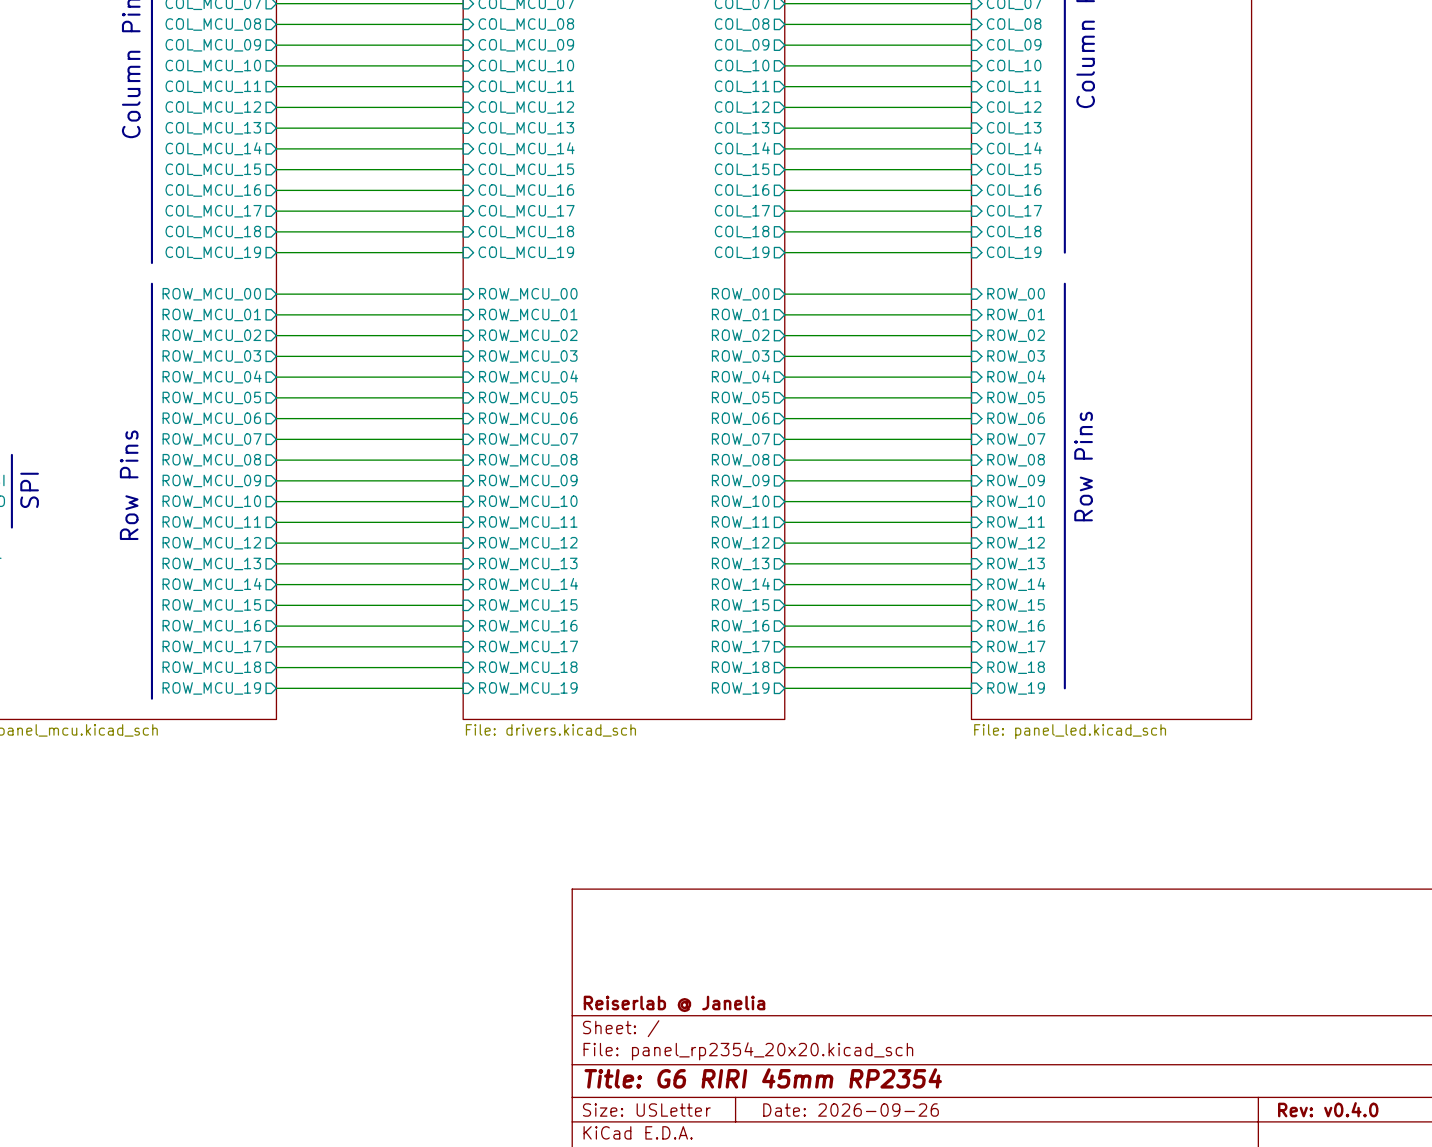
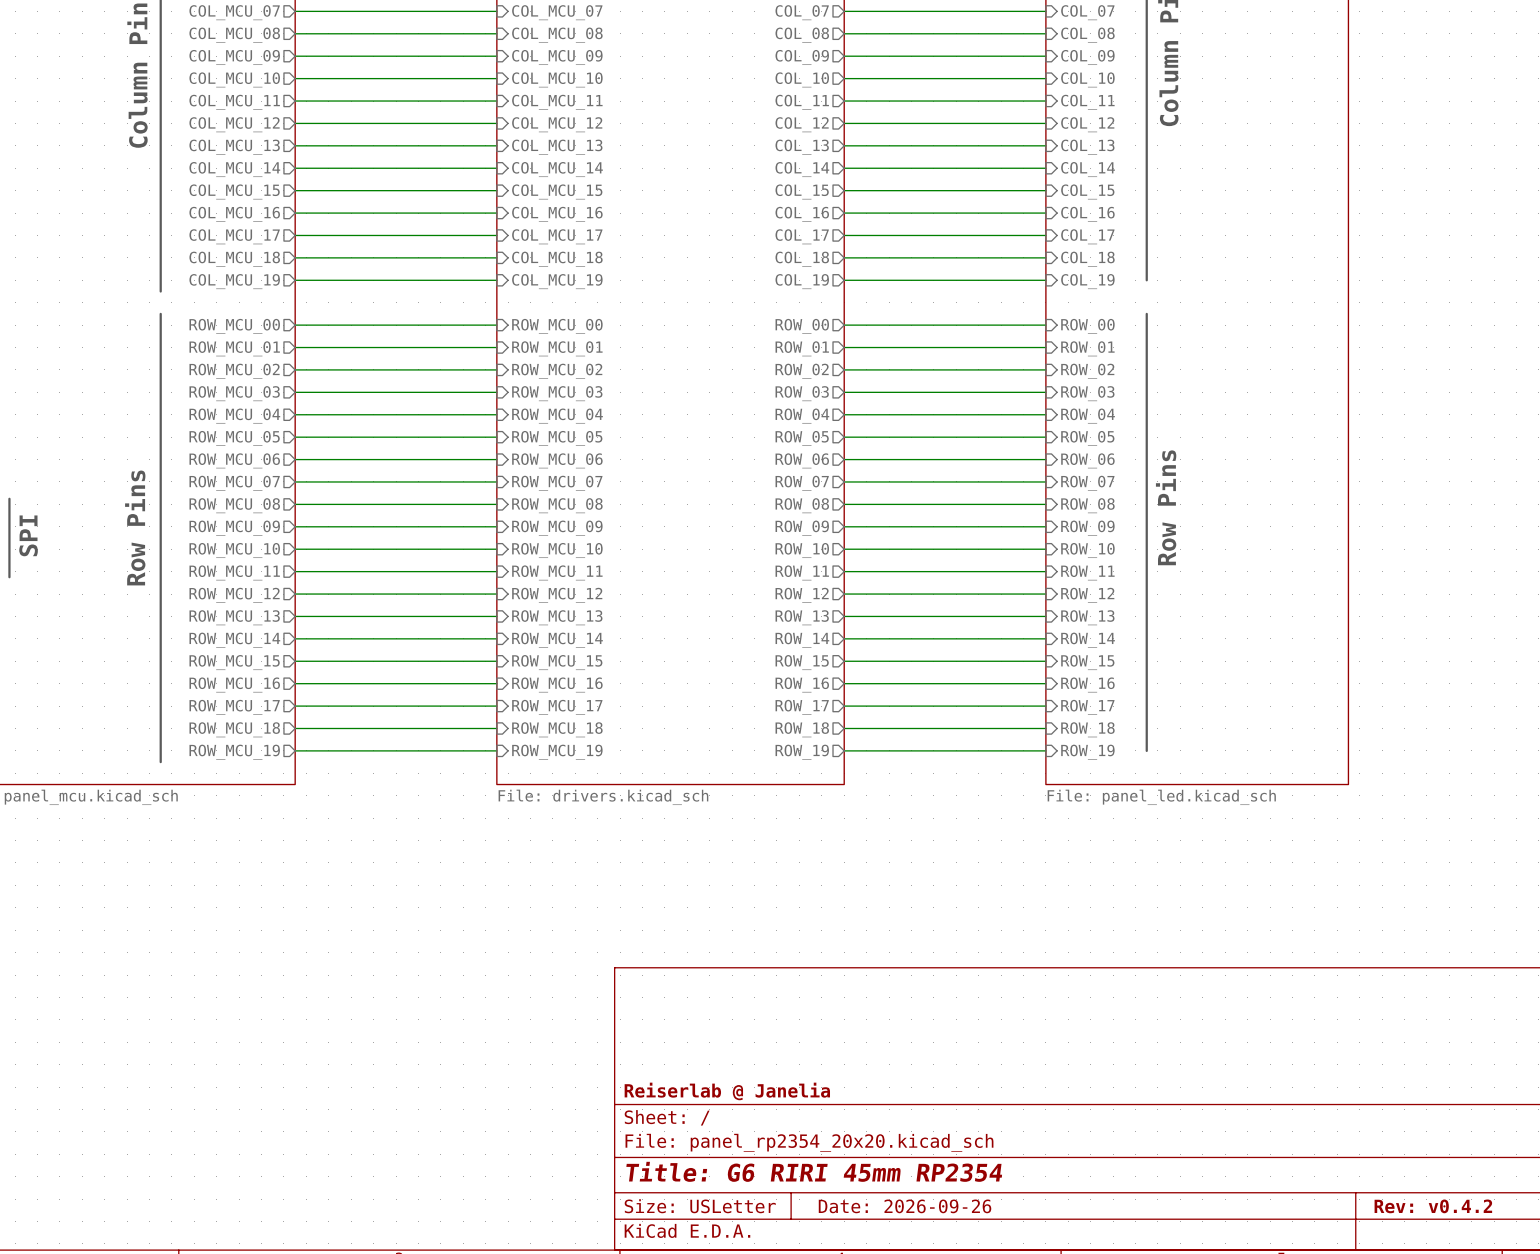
title block: Rev: v0.4.0 (1328, 1109) -> Rev: v0.4.2 (1433, 1206)

